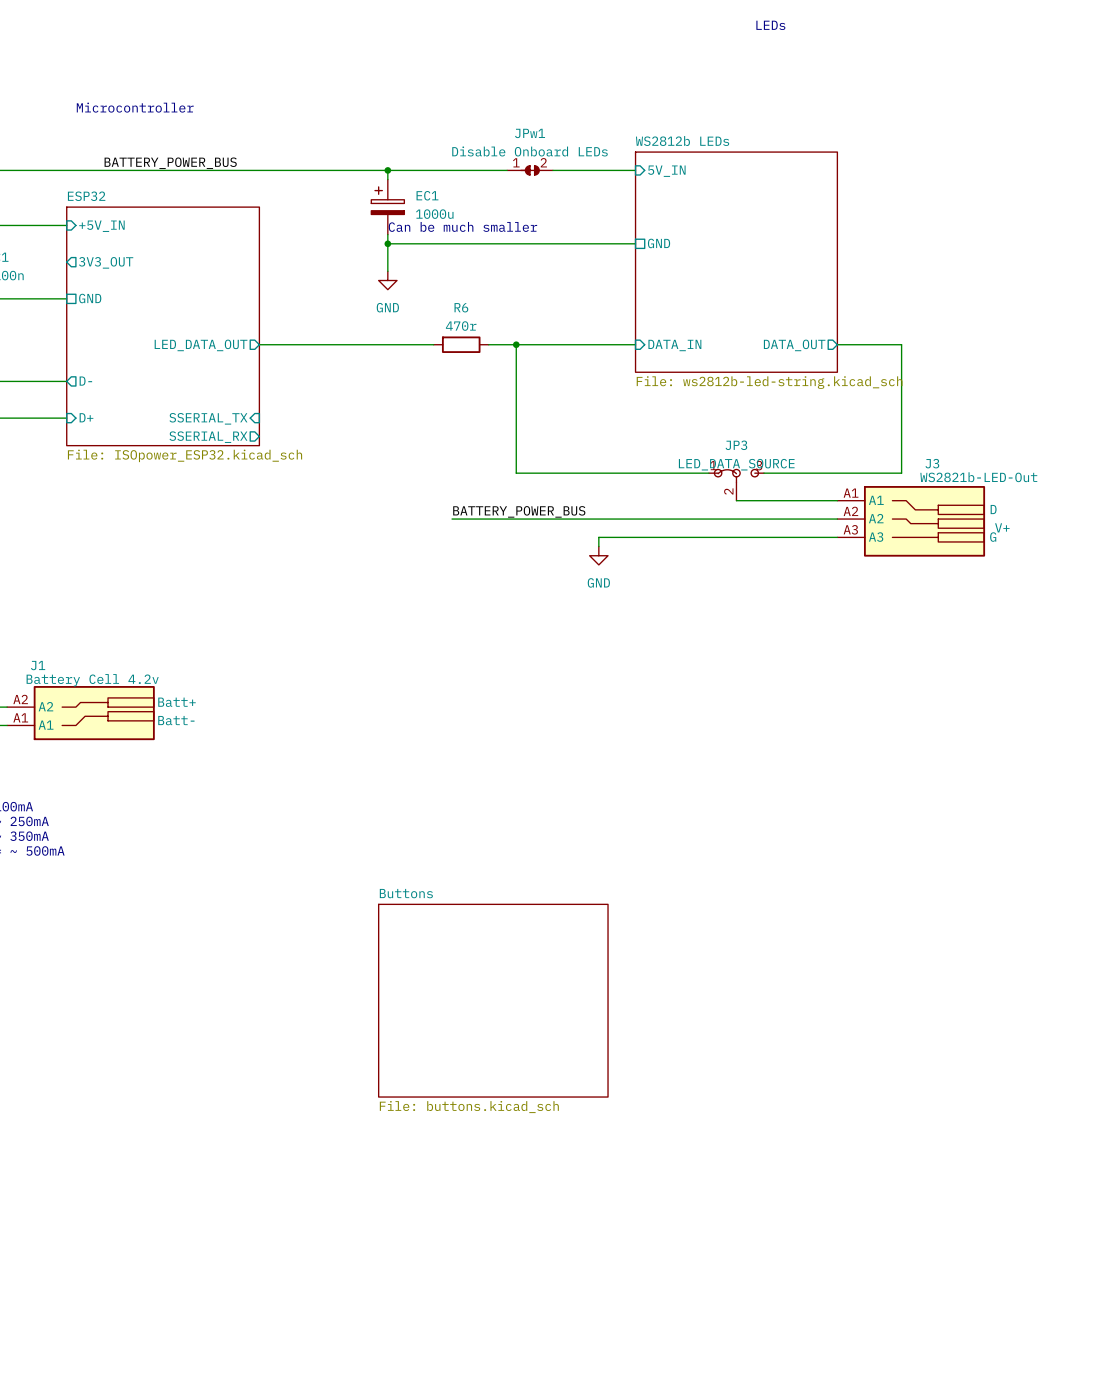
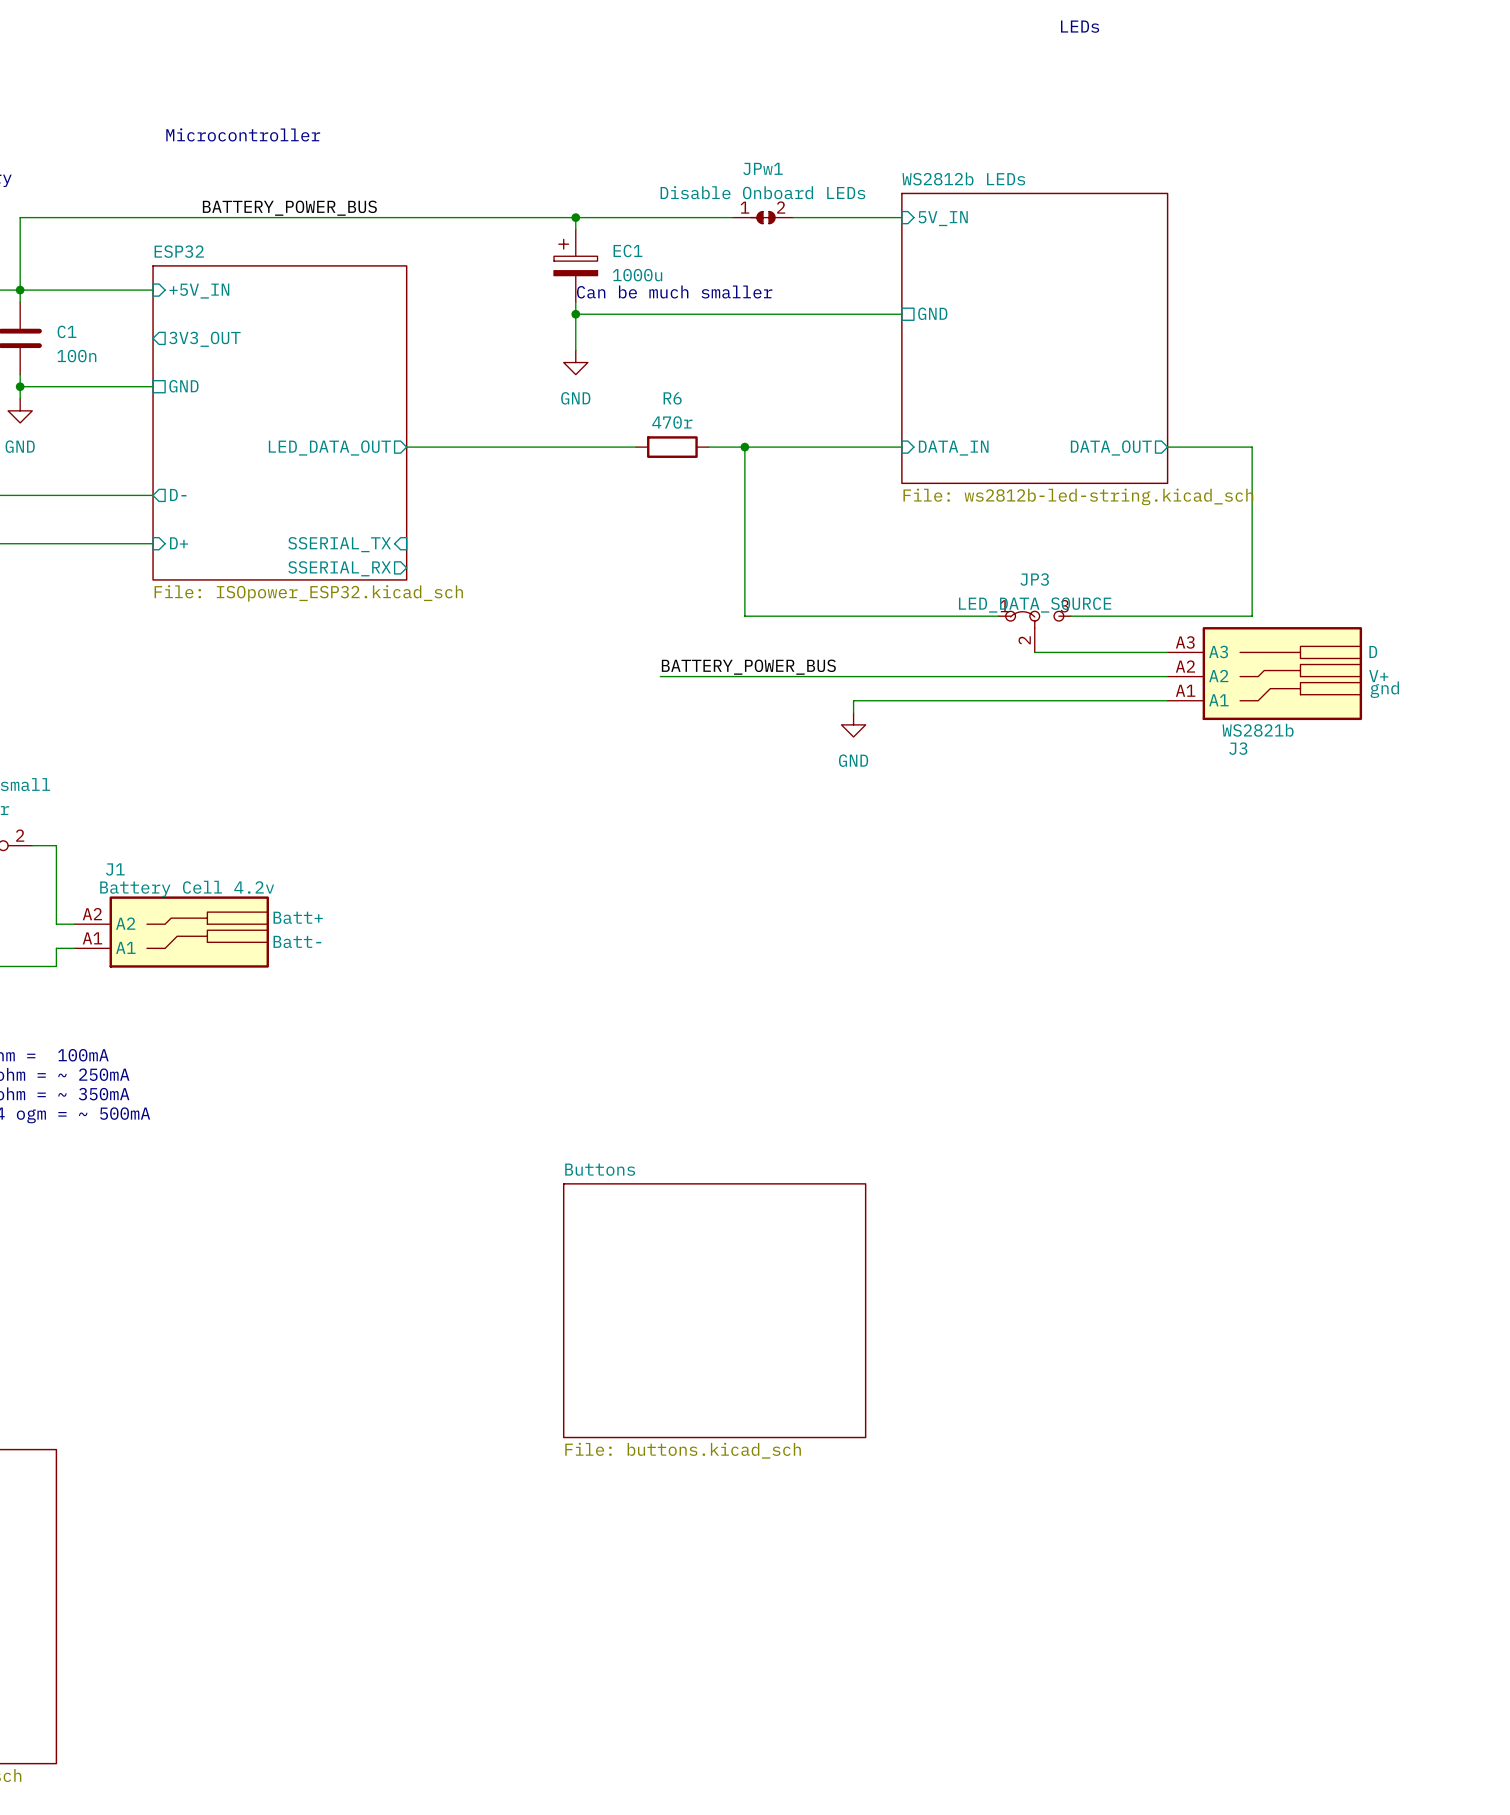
J3 name position: J3 (932, 463) -> J3 (1238, 748)
J3 value: WS2821b-LED-Out (978, 477) -> WS2821b (1258, 730)
J3 text: none -> D (1373, 651)
J3 text: D (993, 509) -> none
J3 text: none -> V+ (1378, 676)
J3 flip: as is (924, 521) -> up-down (1282, 673)
J3 text: V+ (1002, 527) -> none
J3 text: none -> gnd (1384, 689)
J3 text: G (993, 537) -> none

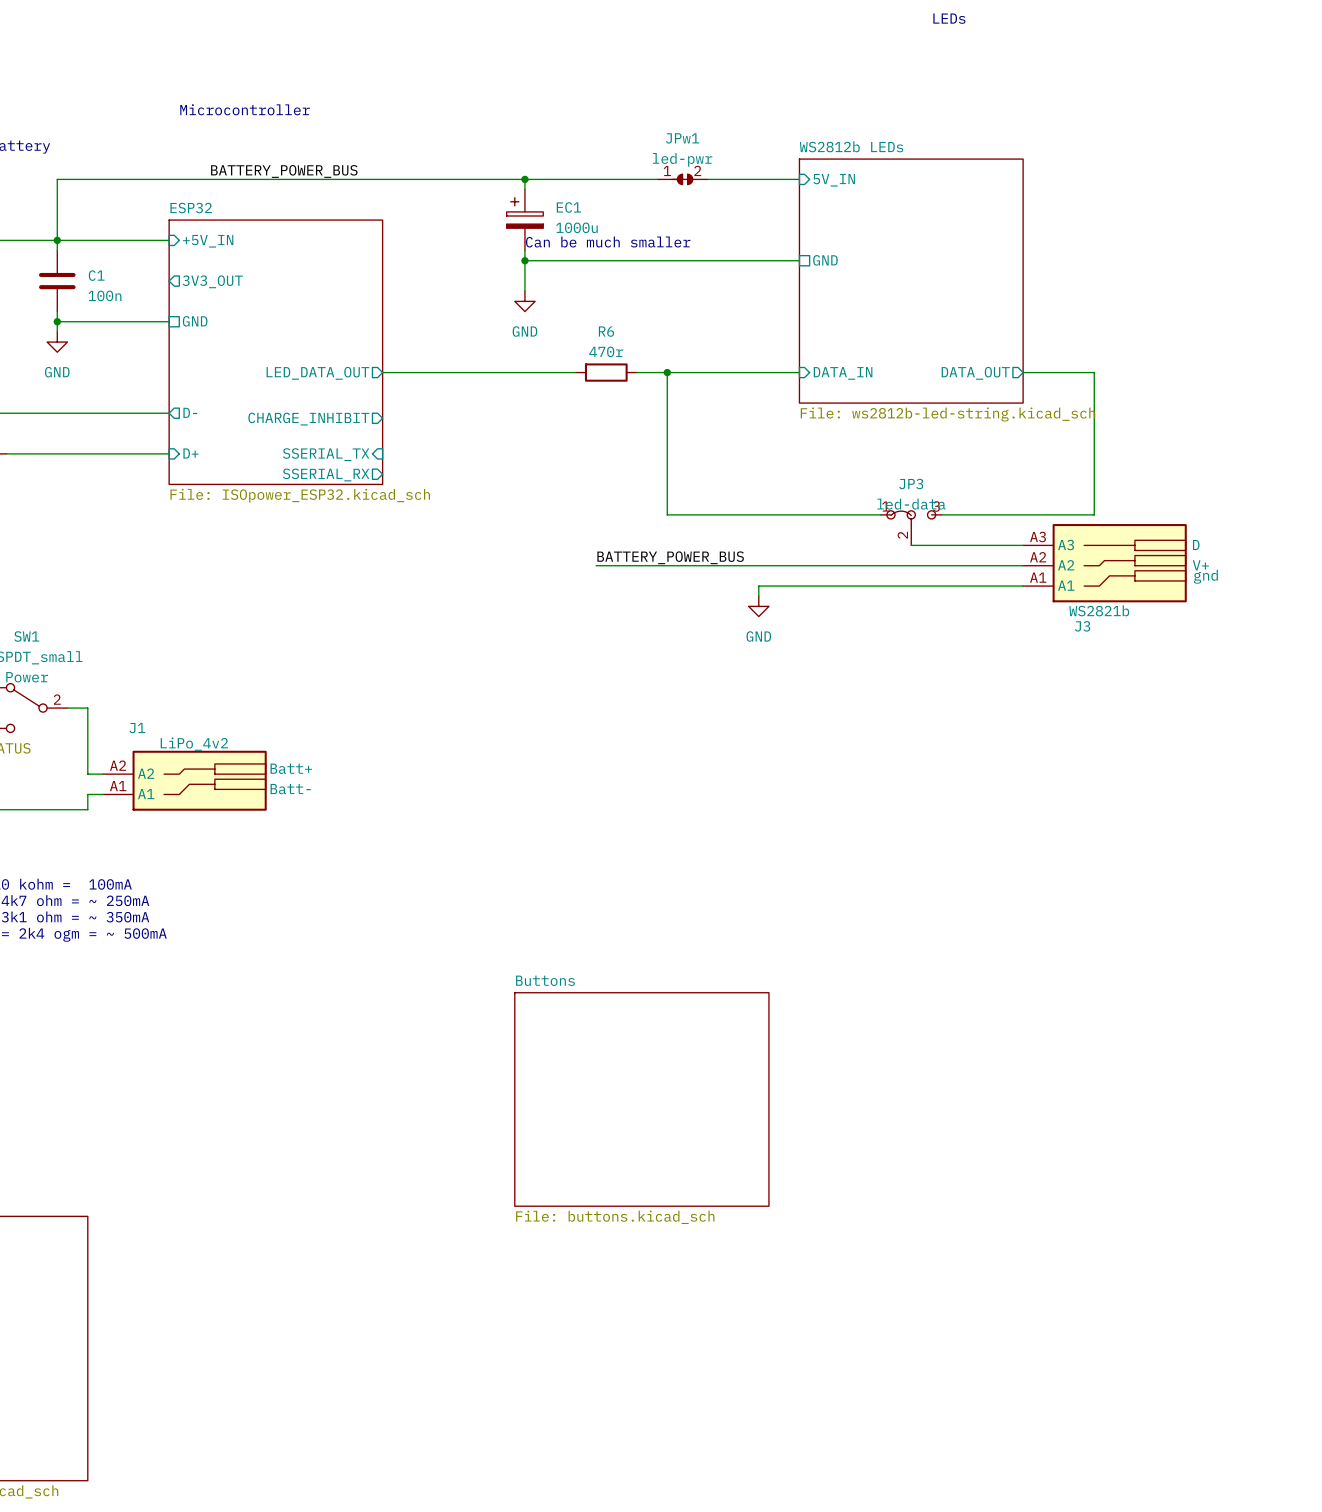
JPw1 value: Disable Onboard LEDs (762, 192) -> led-pwr (682, 159)
sheet pin: none -> CHARGE_INHIBIT (308, 419)
JP3 value: LED_DATA_SOURCE (1035, 605) -> led-data (911, 504)
J1 value: Battery Cell 4.2v (187, 888) -> LiPo_4v2 (194, 744)

